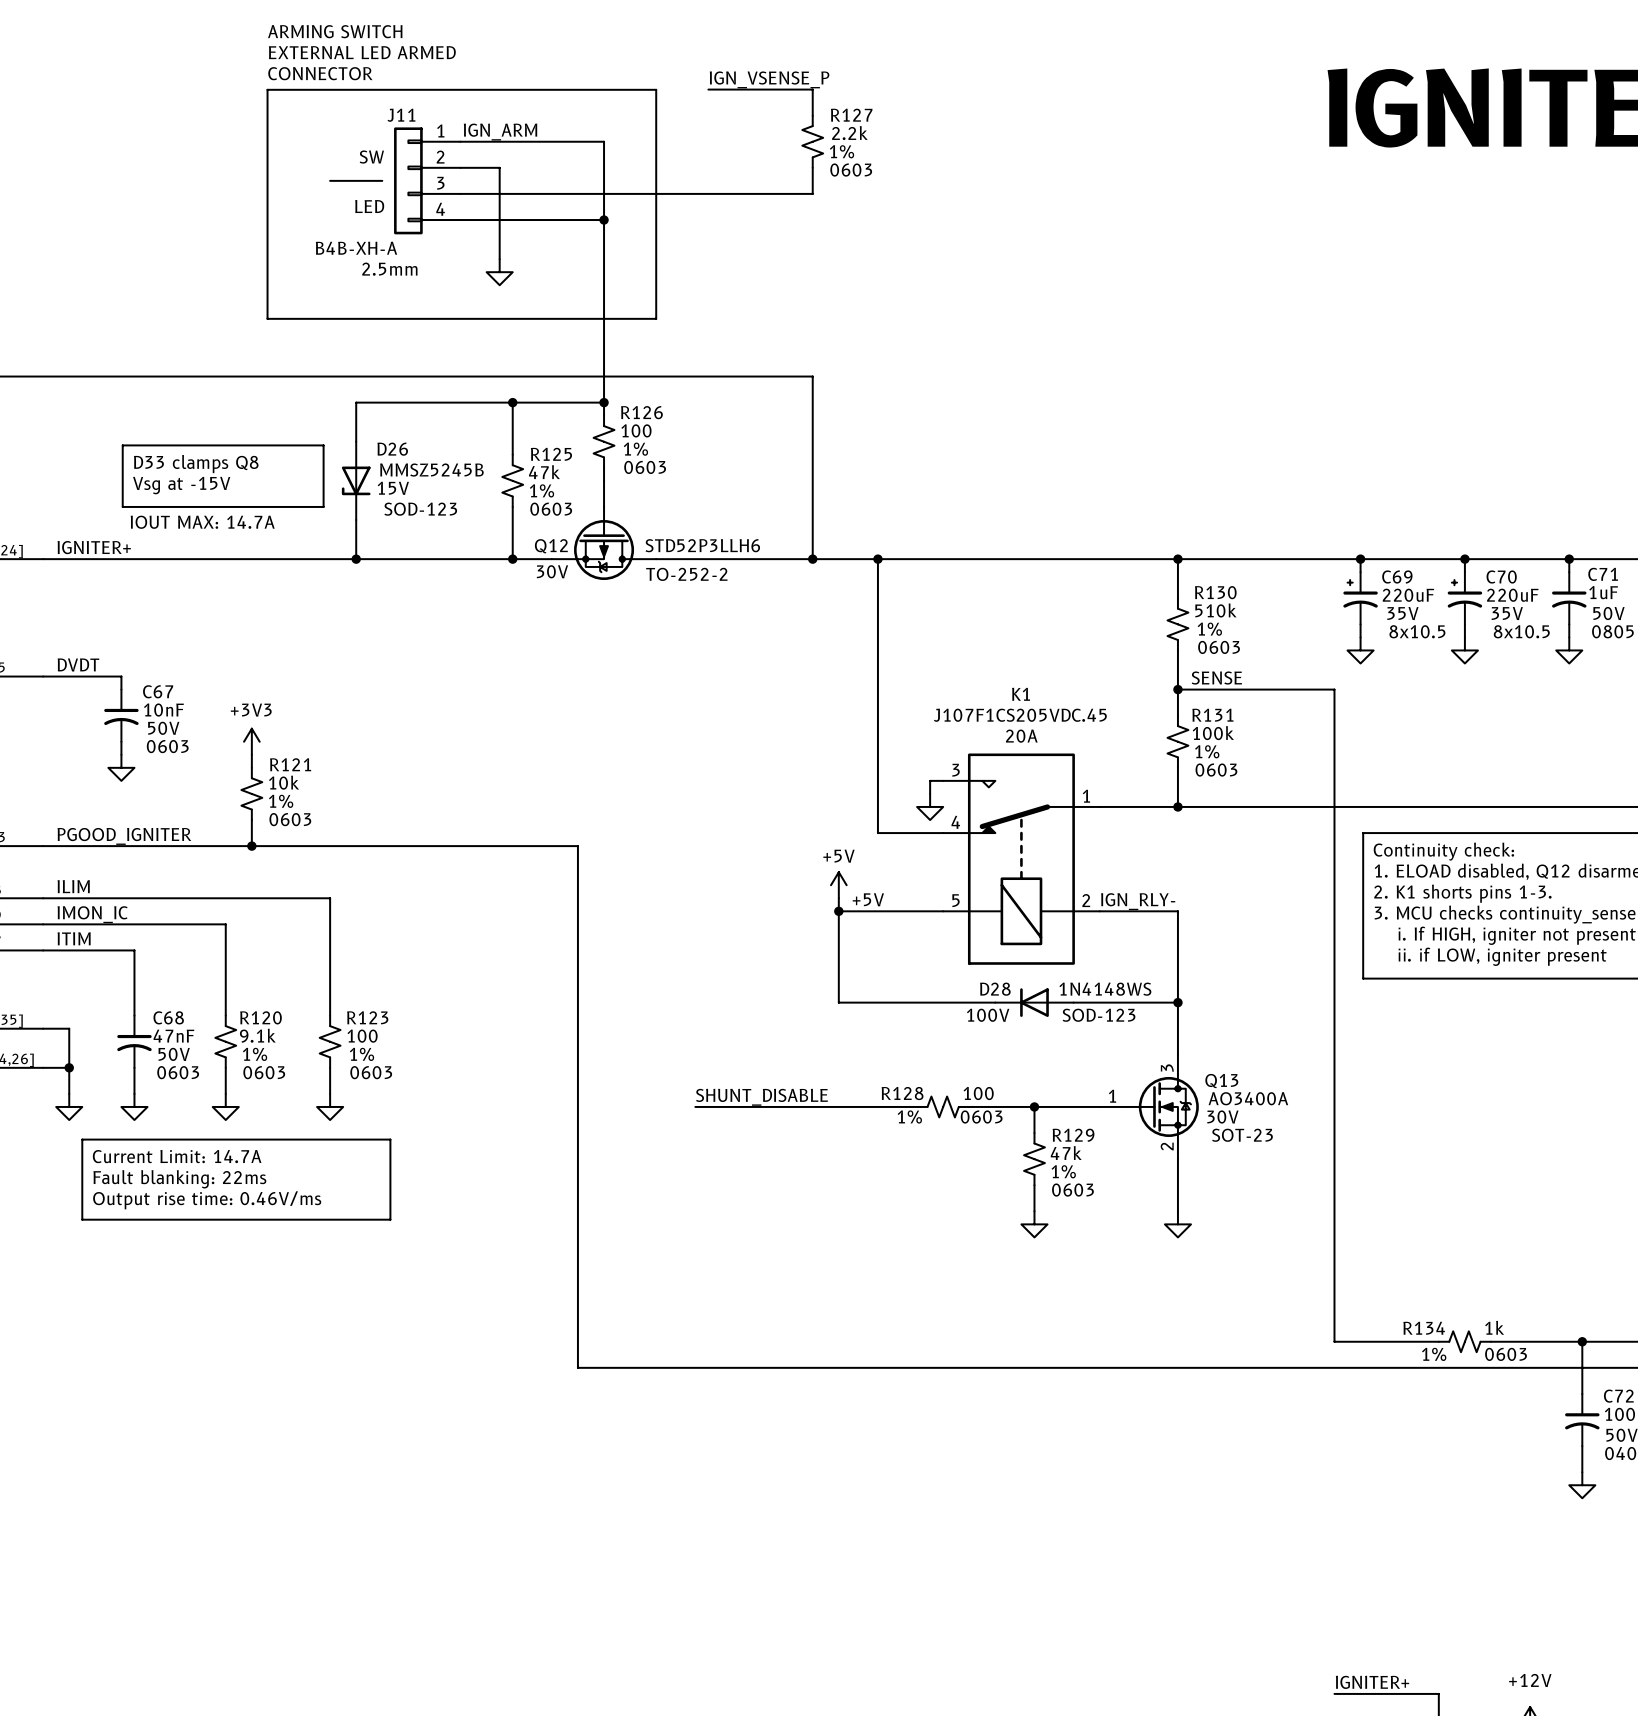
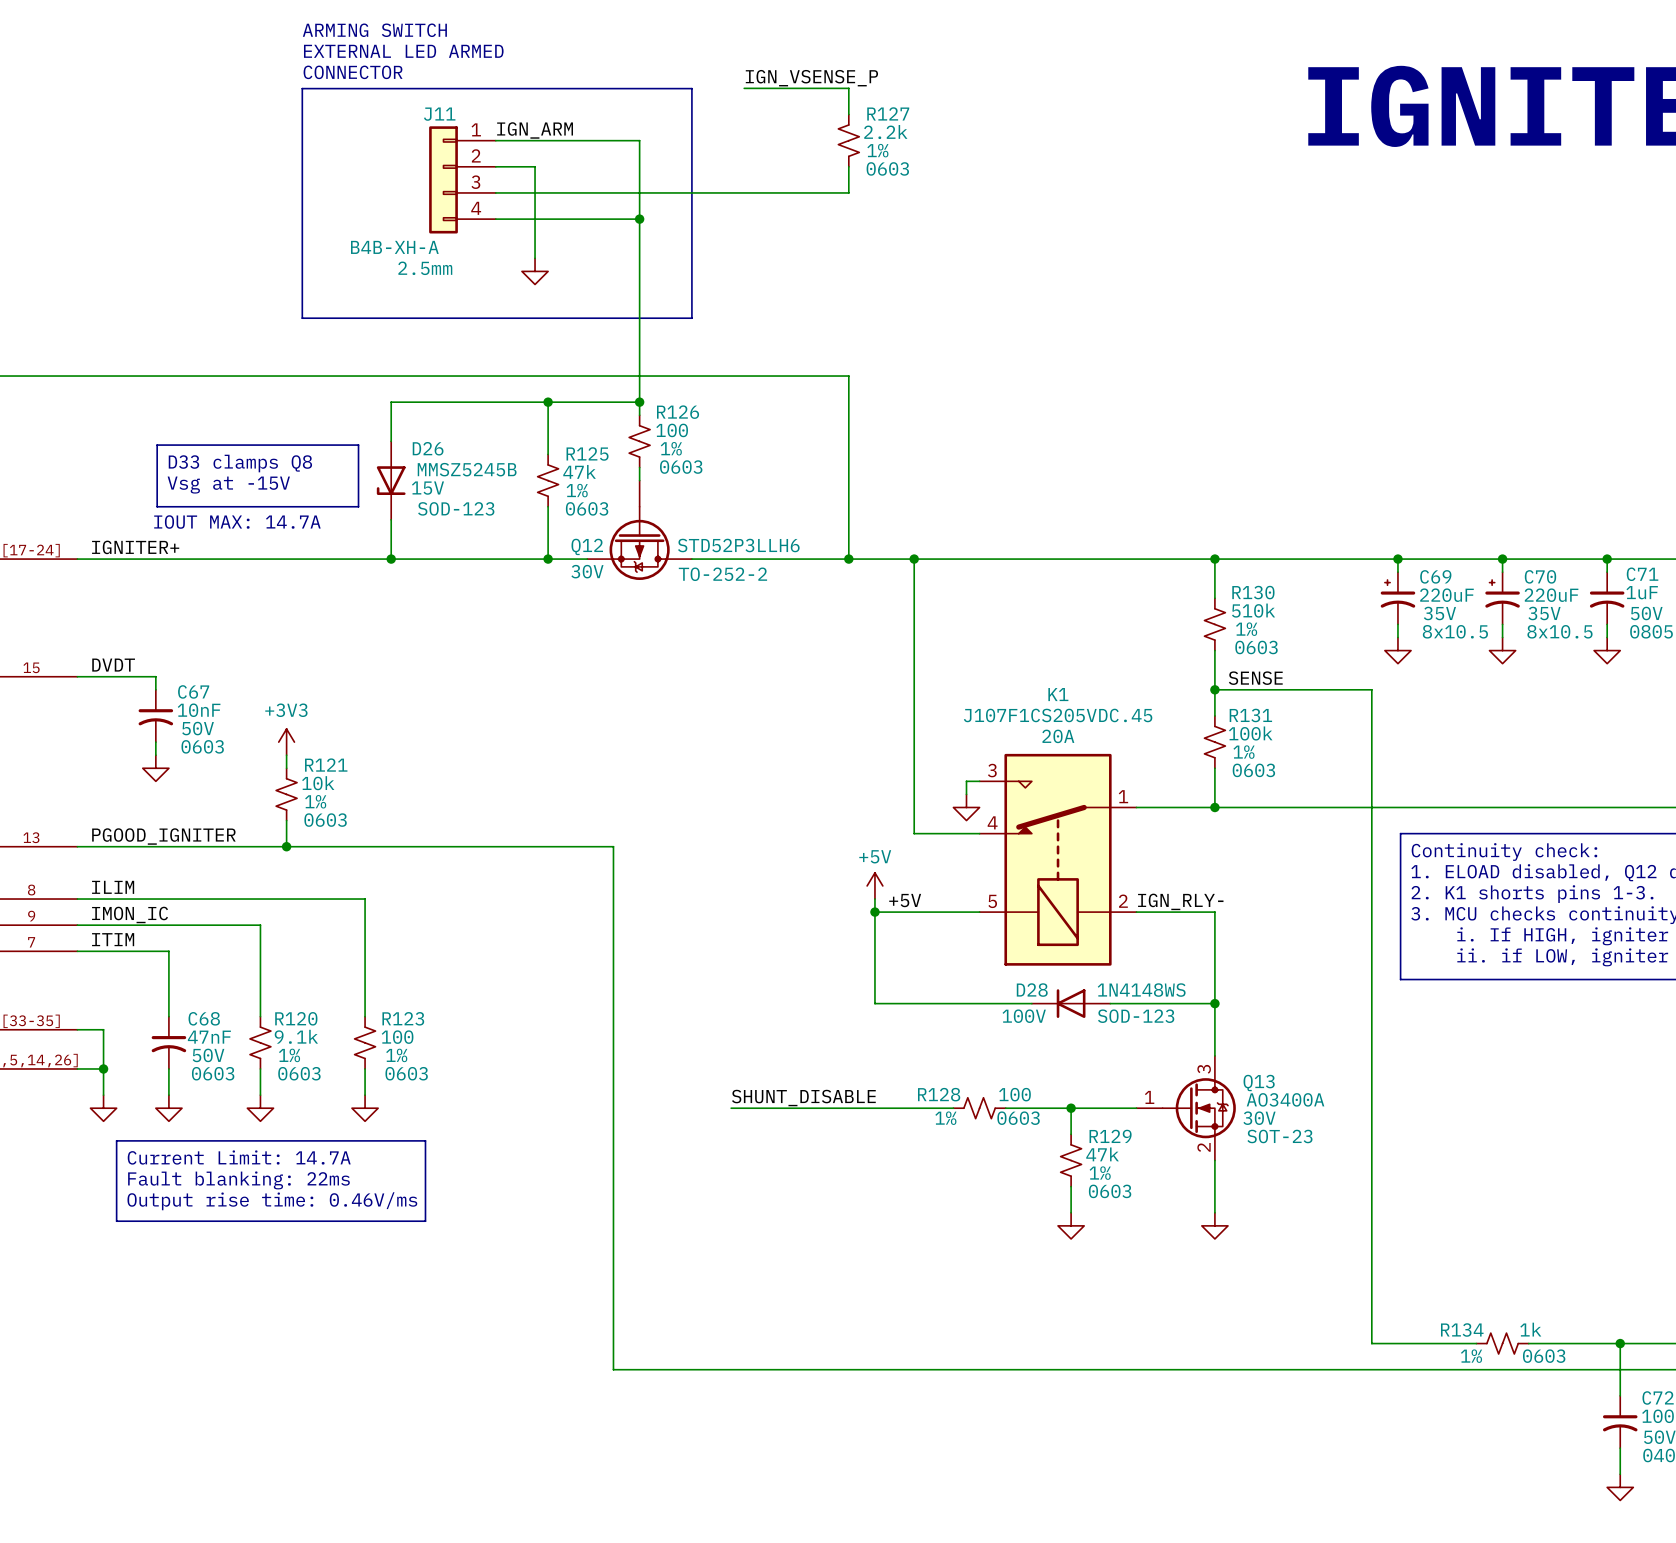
text: SW (371, 157) -> none
line: (330, 180) (382, 180) -> none
text: LED (369, 206) -> none

